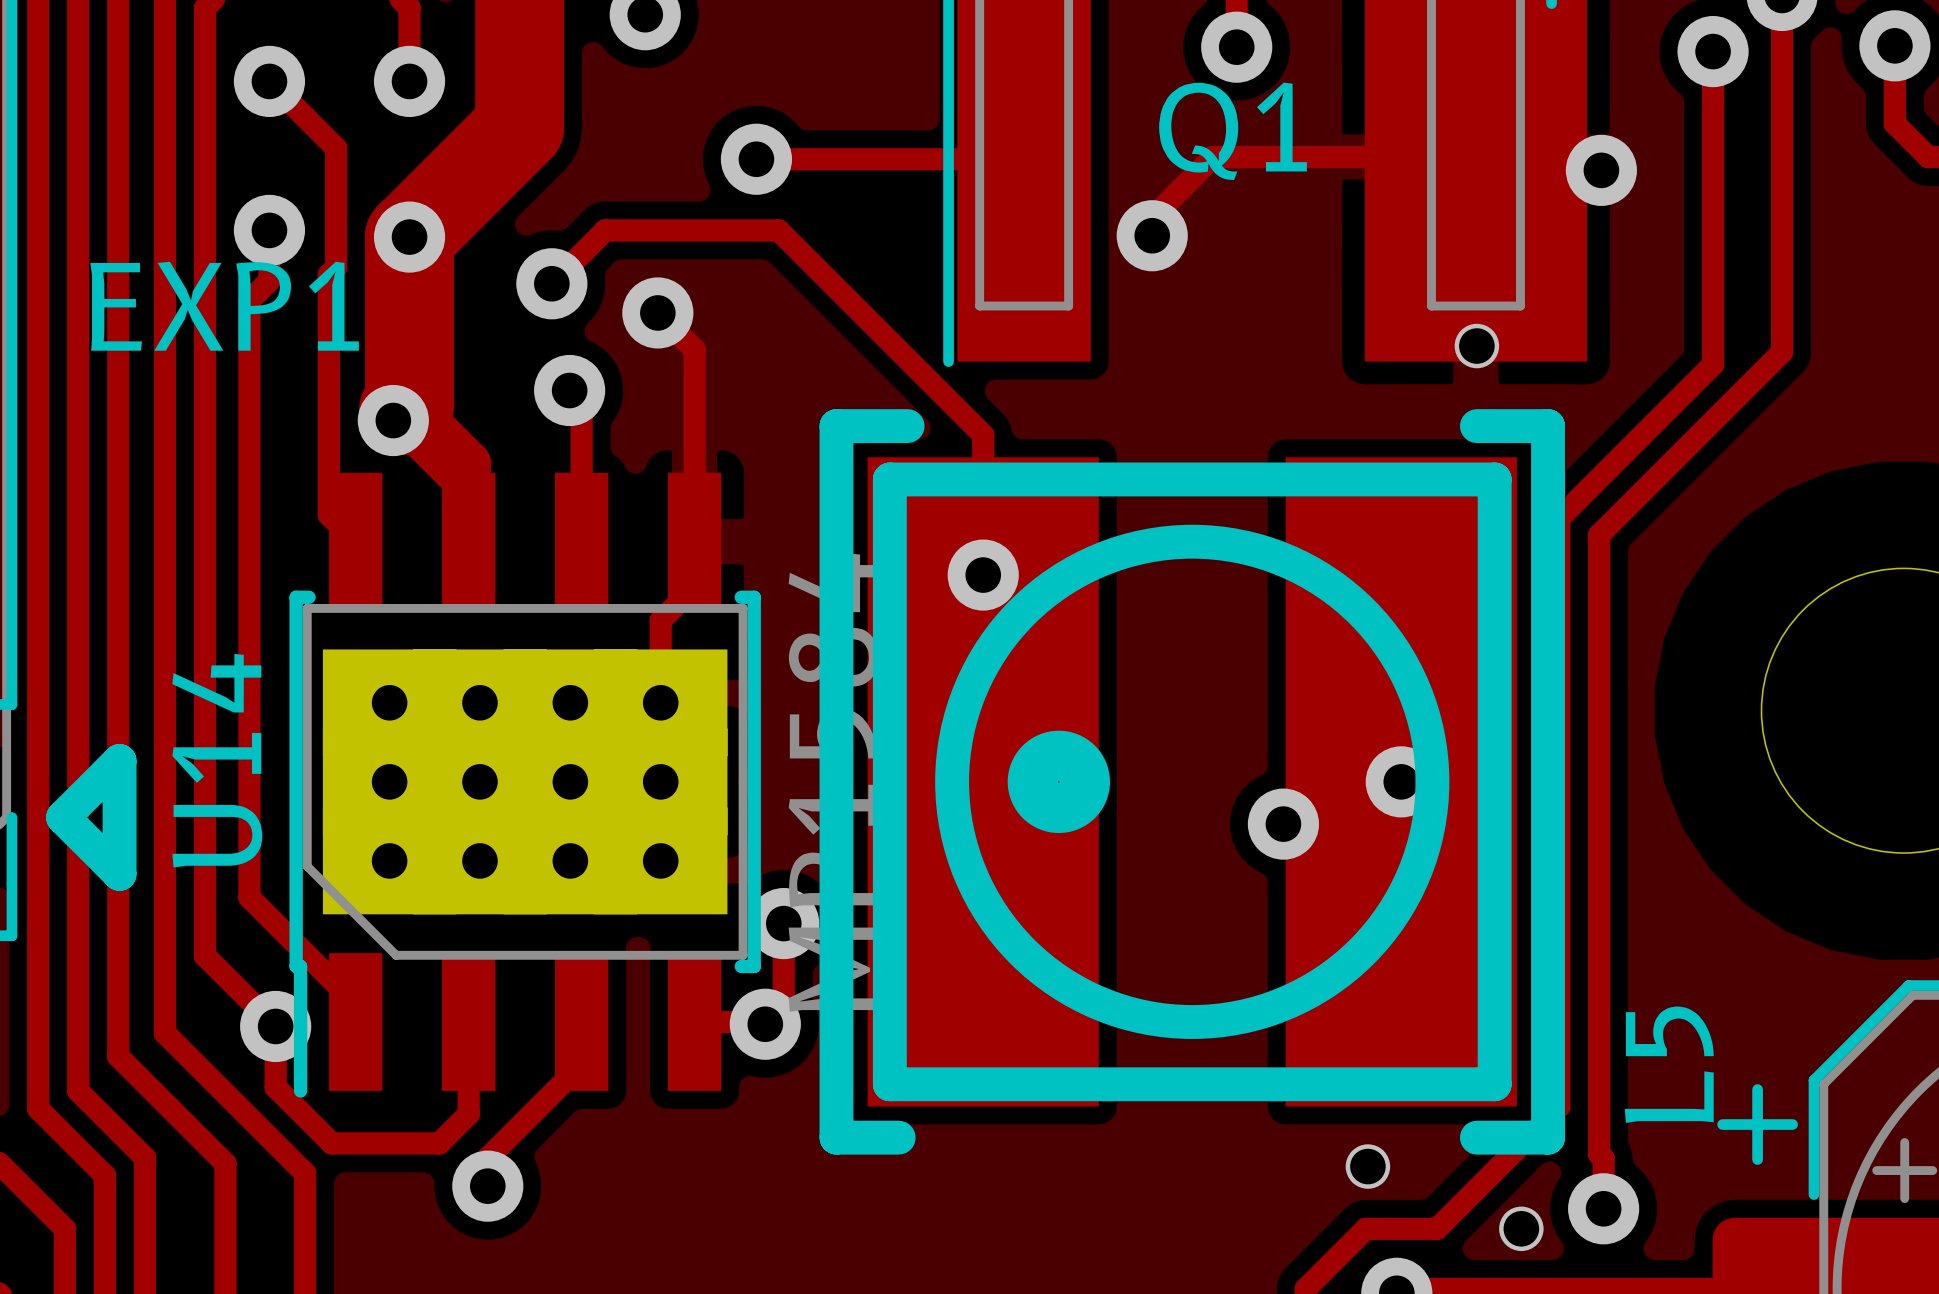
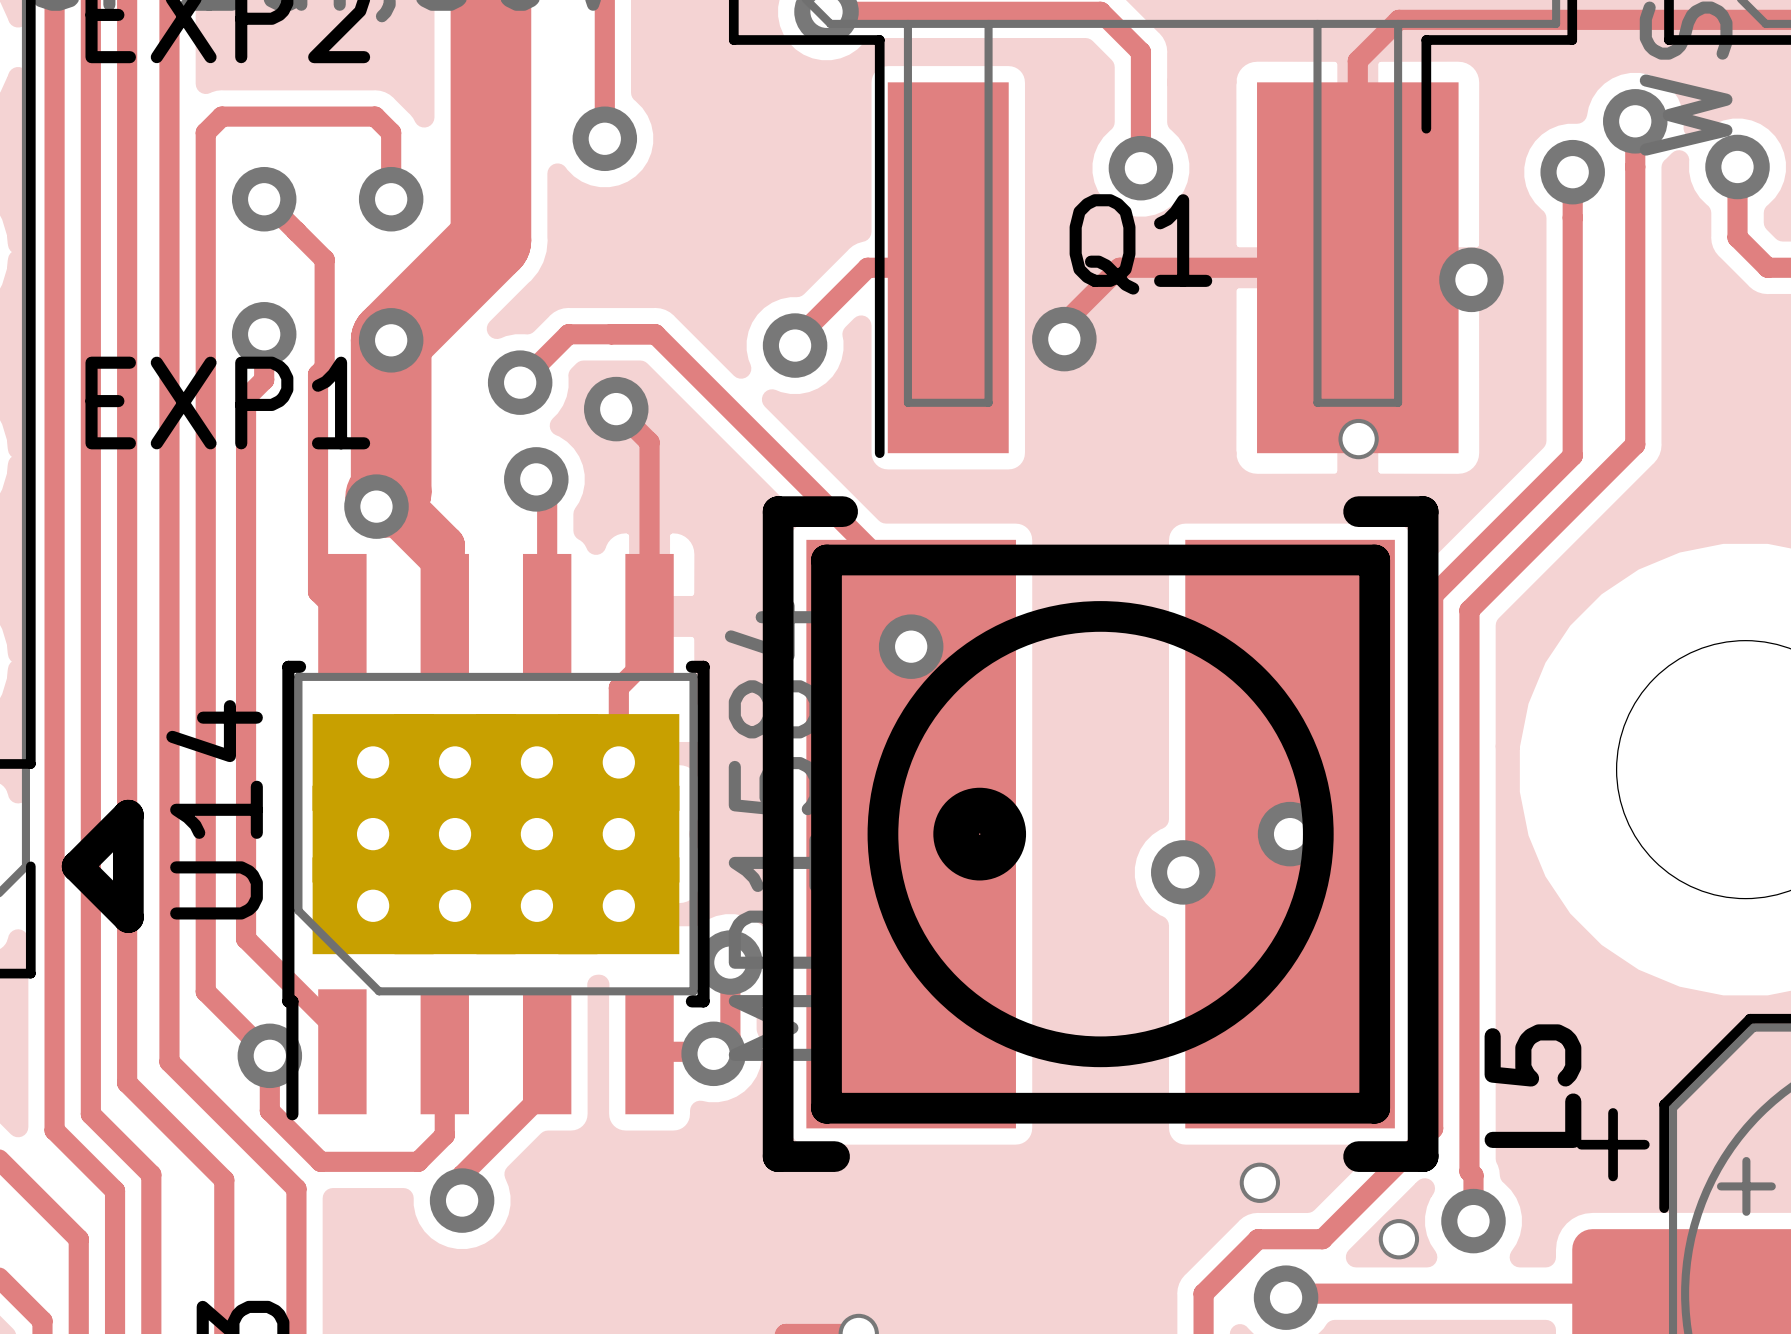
track: (1024, 157) (1021, 159) (756, 159) -> (948, 267) (867, 267) (795, 340) (795, 345)
via position: (756, 159) -> (795, 345)
track: (701, 230) (778, 230) (983, 434) (983, 512) -> (655, 334) (911, 590)

